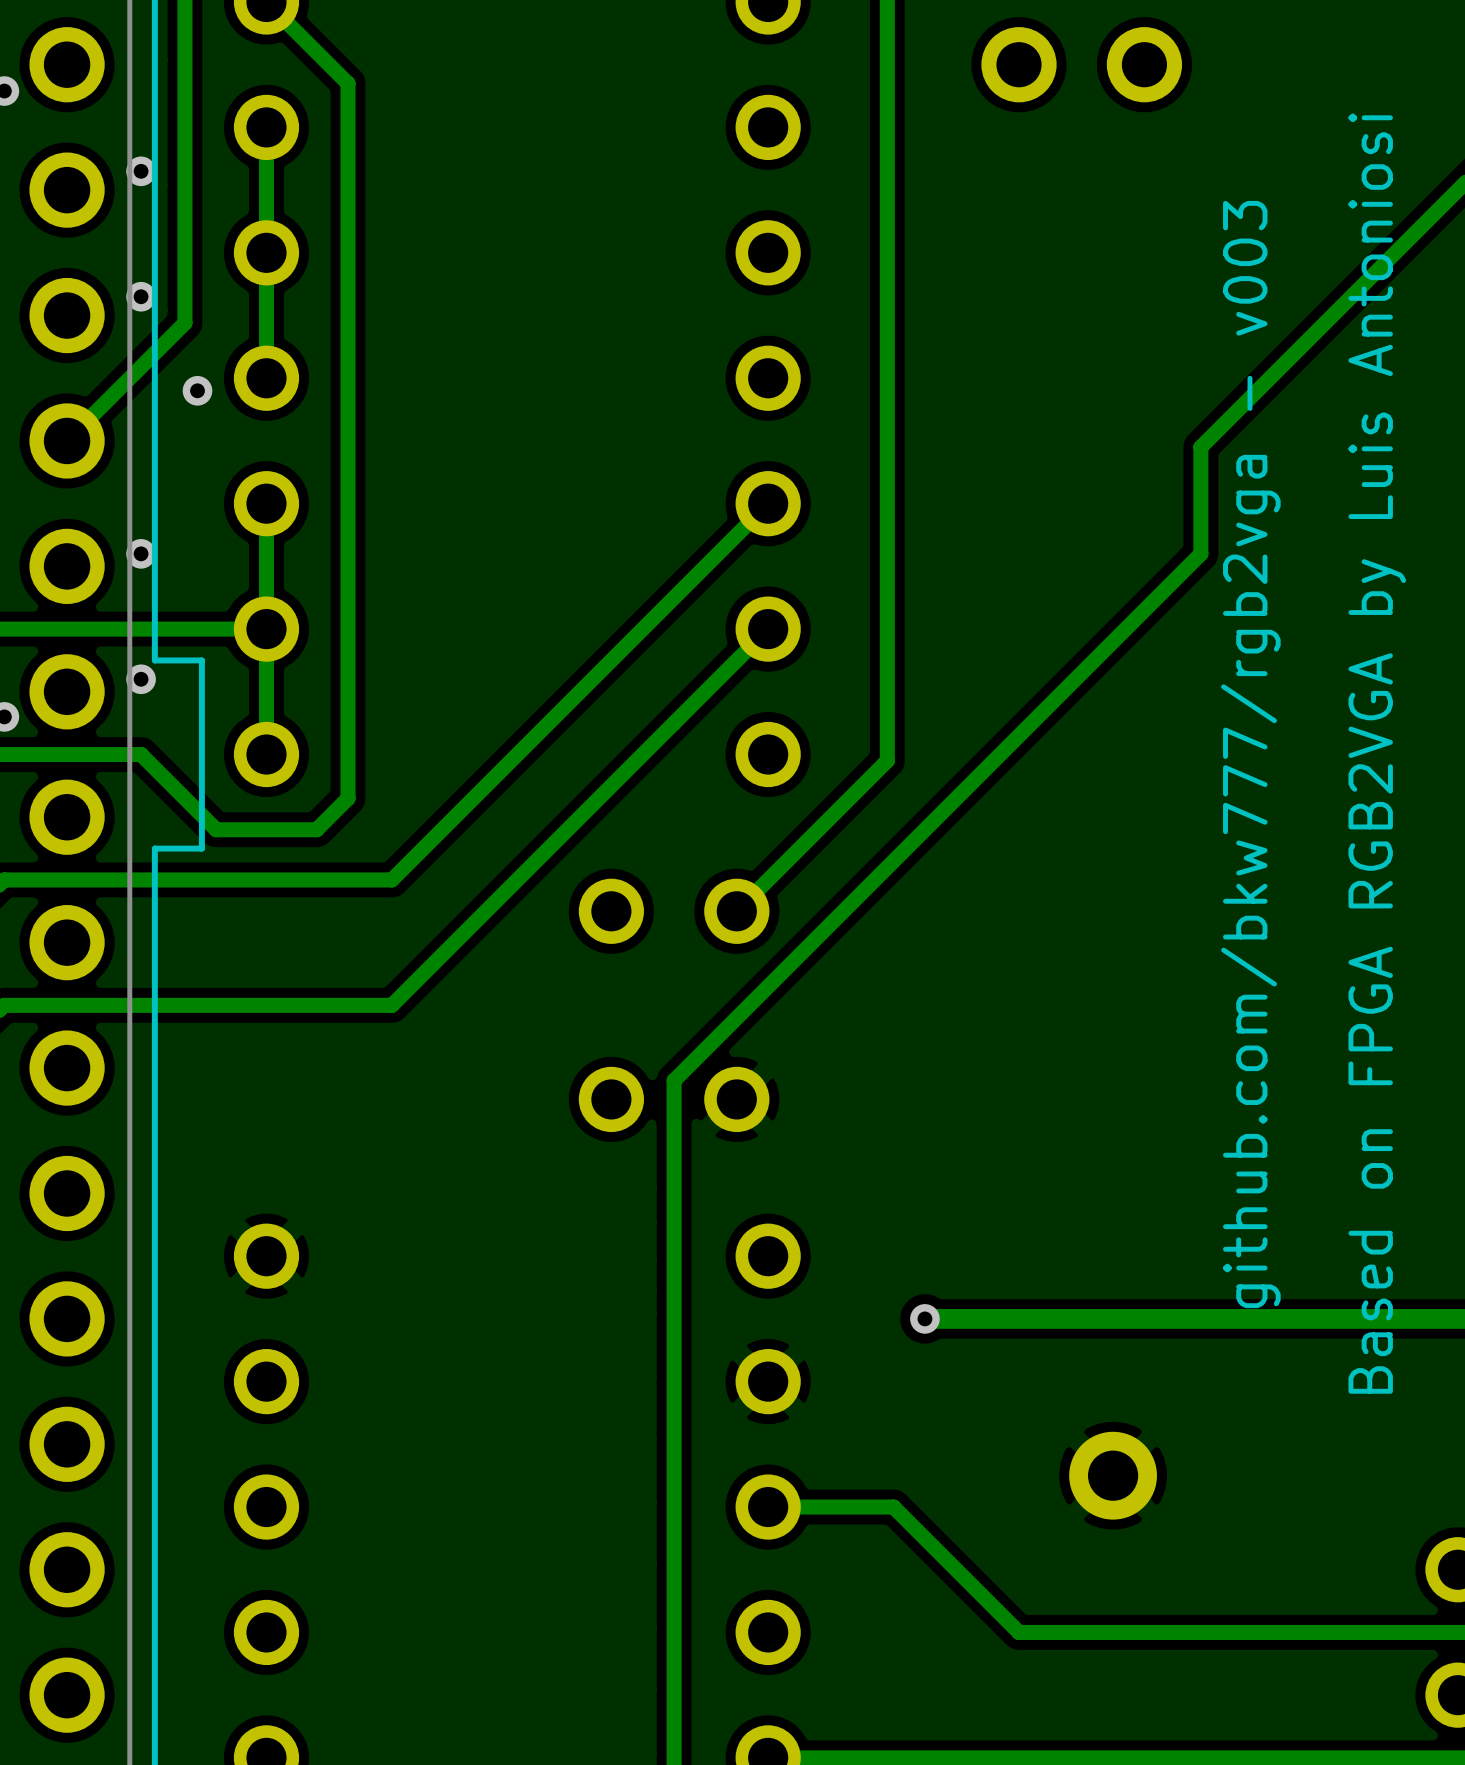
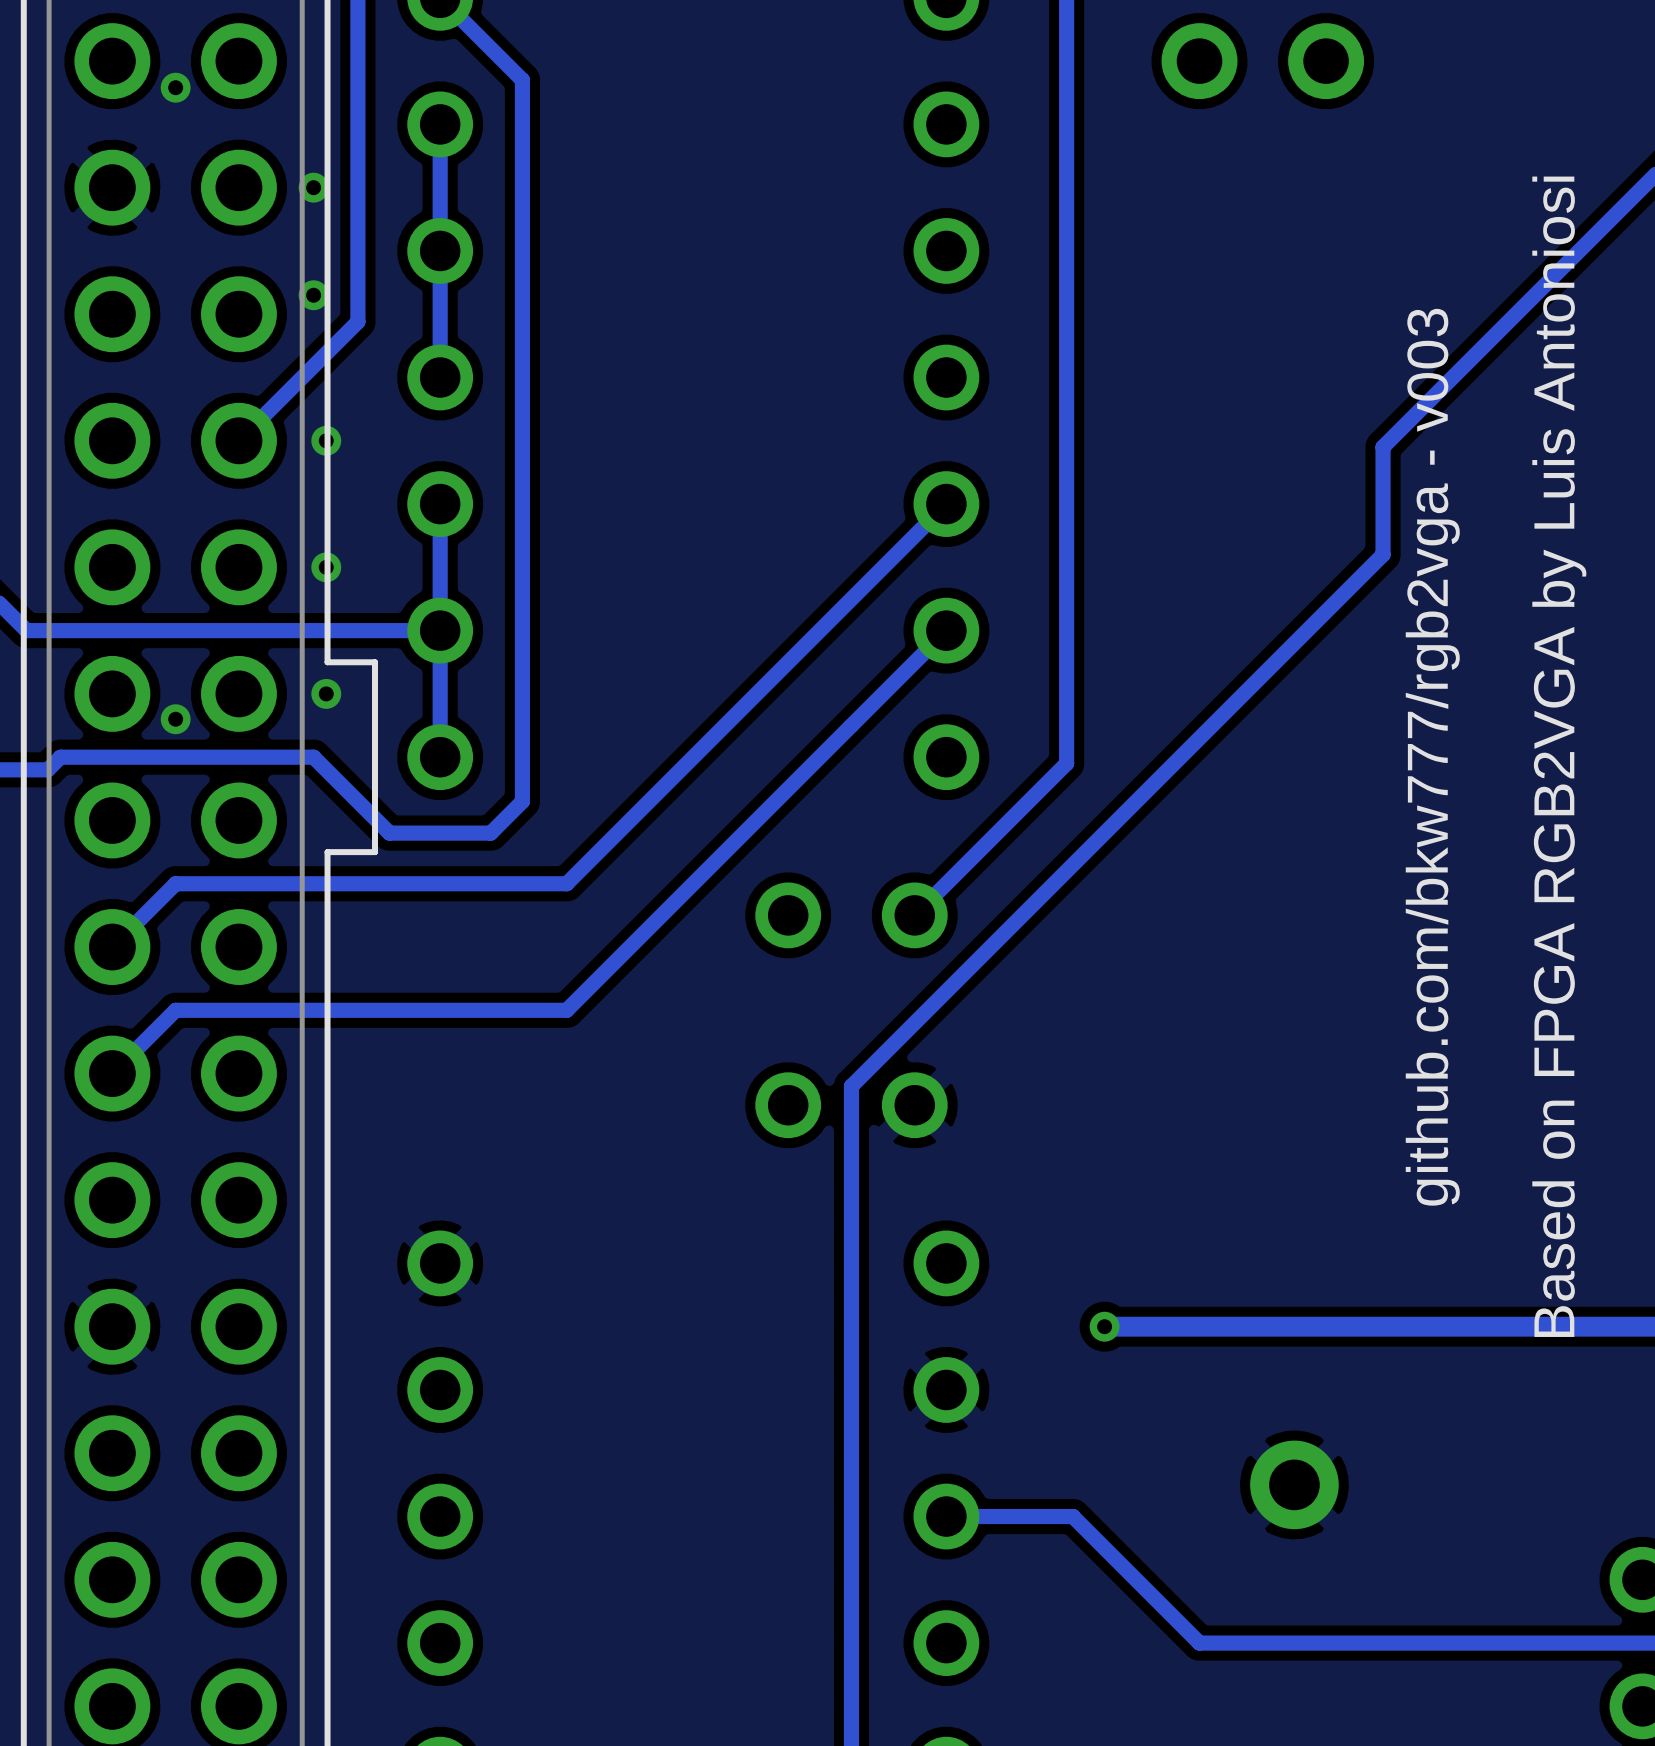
via position: (141, 171) -> (313, 187)
via: (197, 390) -> none
via: none -> (326, 440)
via position: (141, 553) -> (326, 567)
via position: (141, 679) -> (326, 693)

